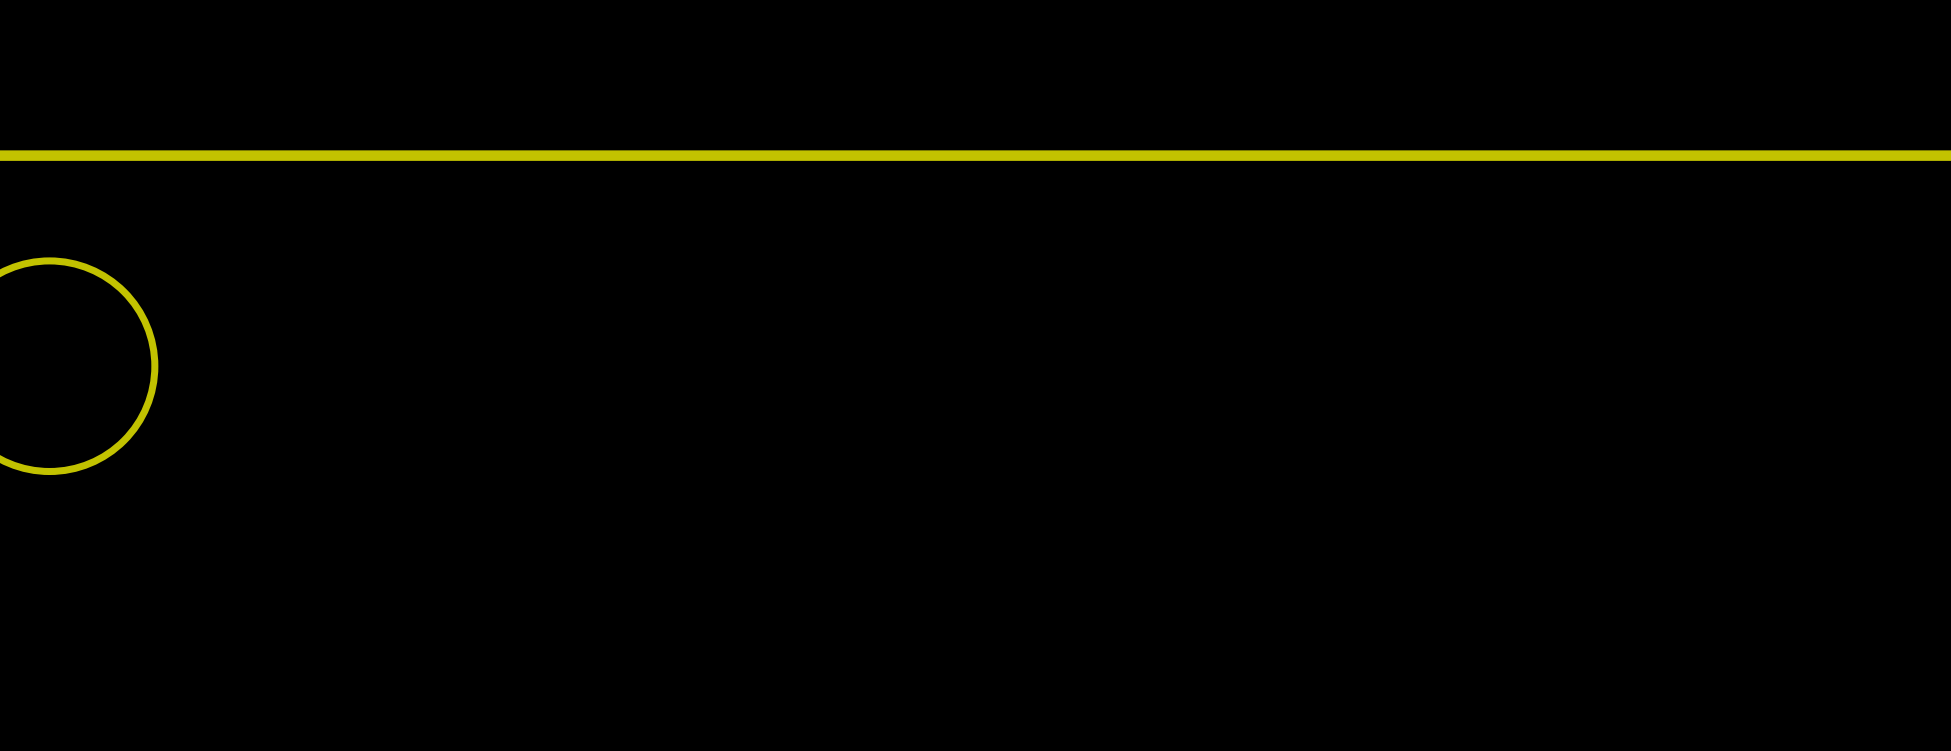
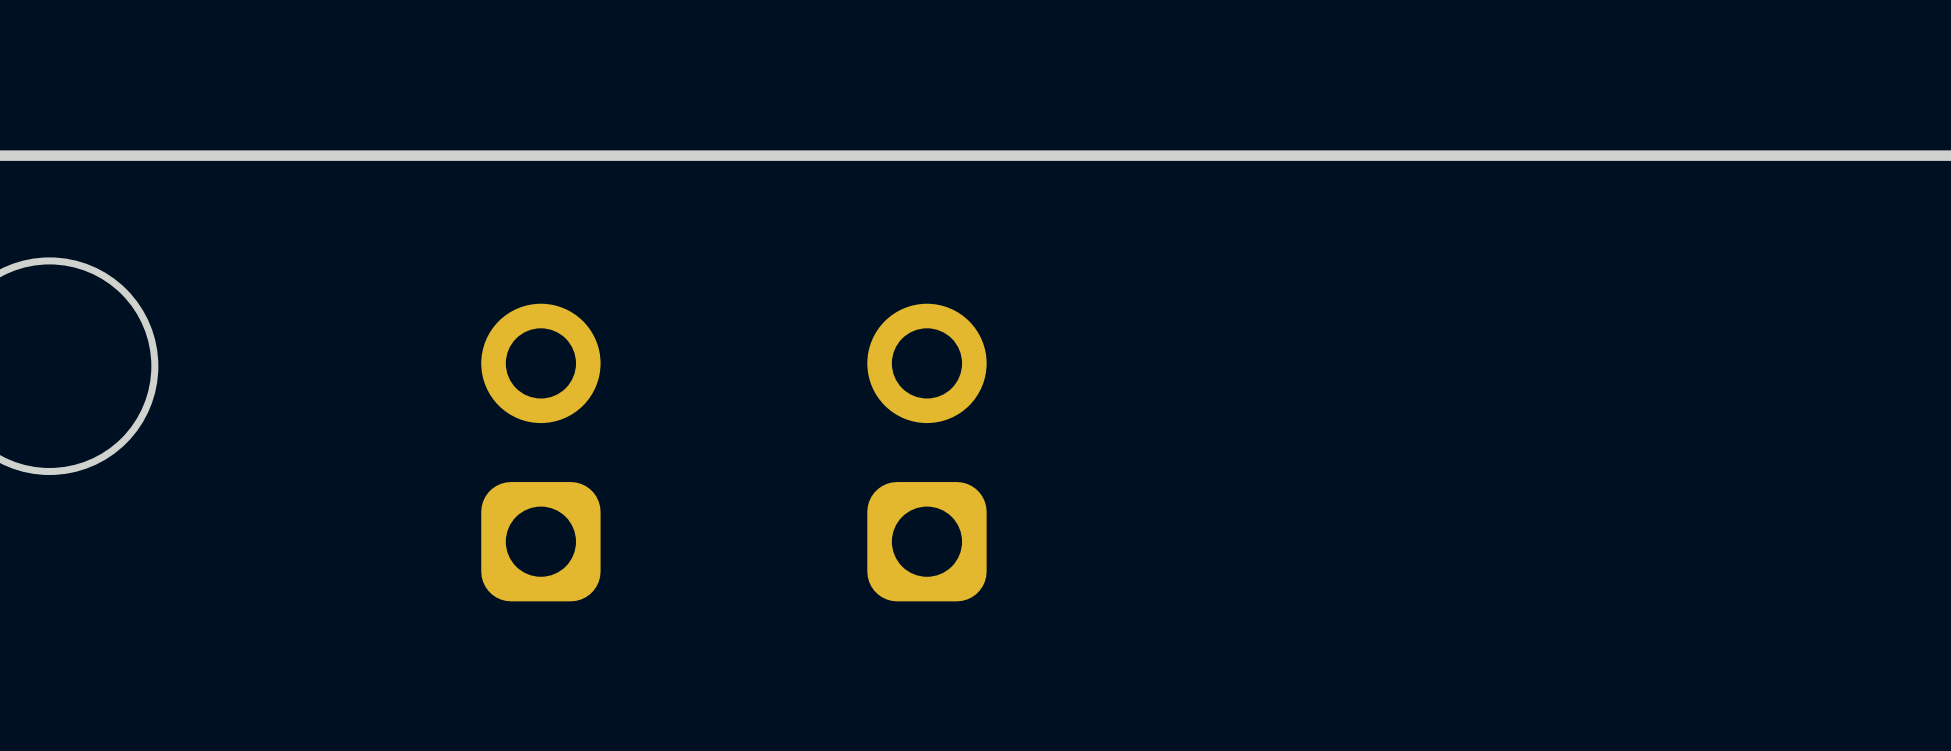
part: none -> (540, 452)
part: none -> (926, 452)

